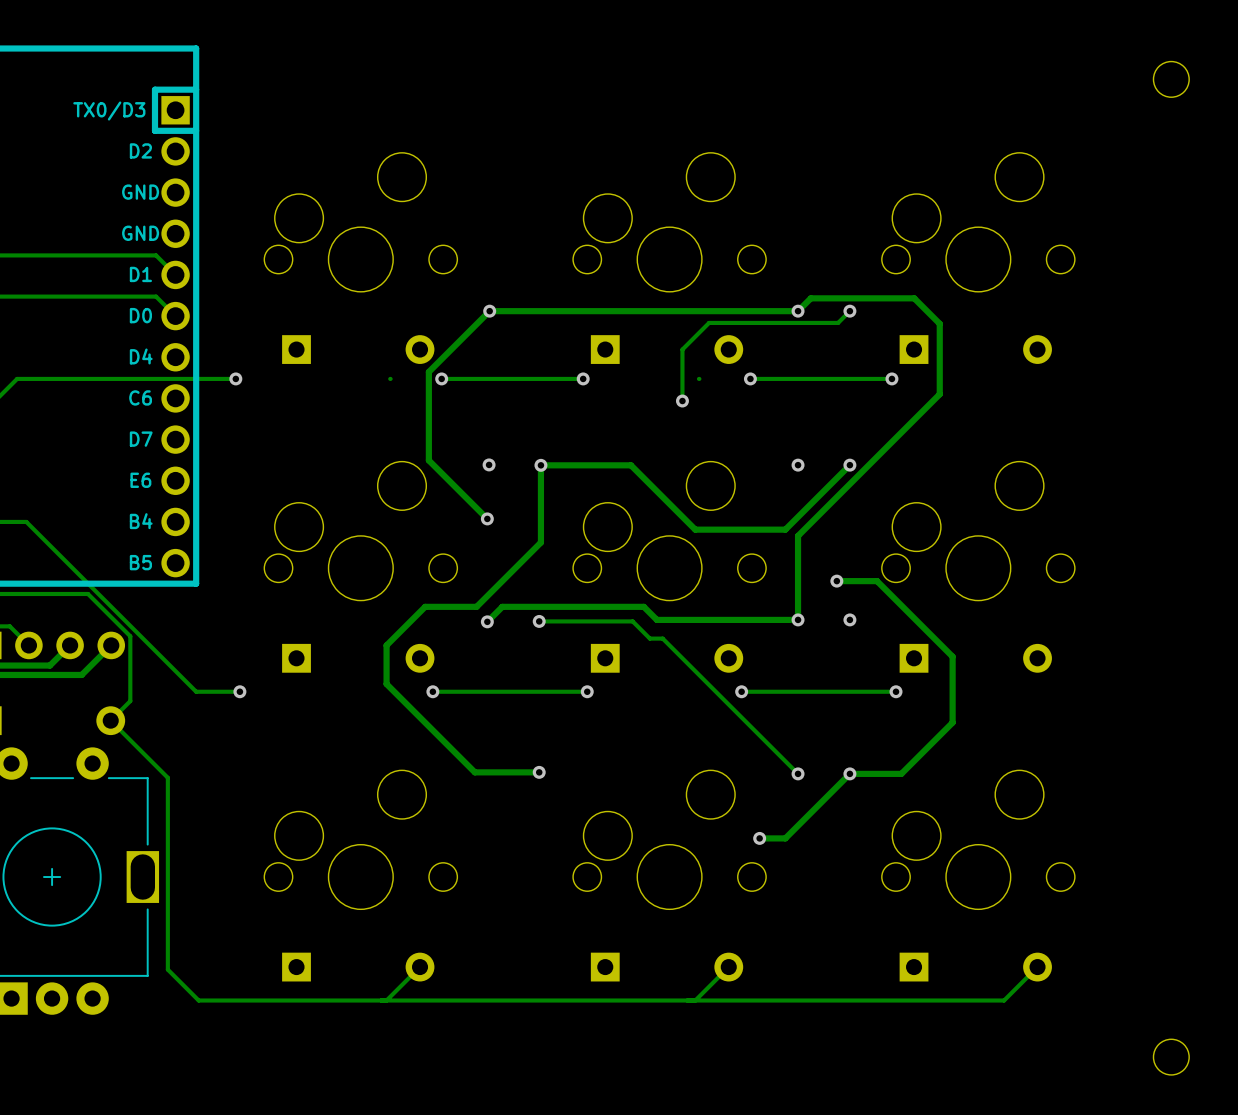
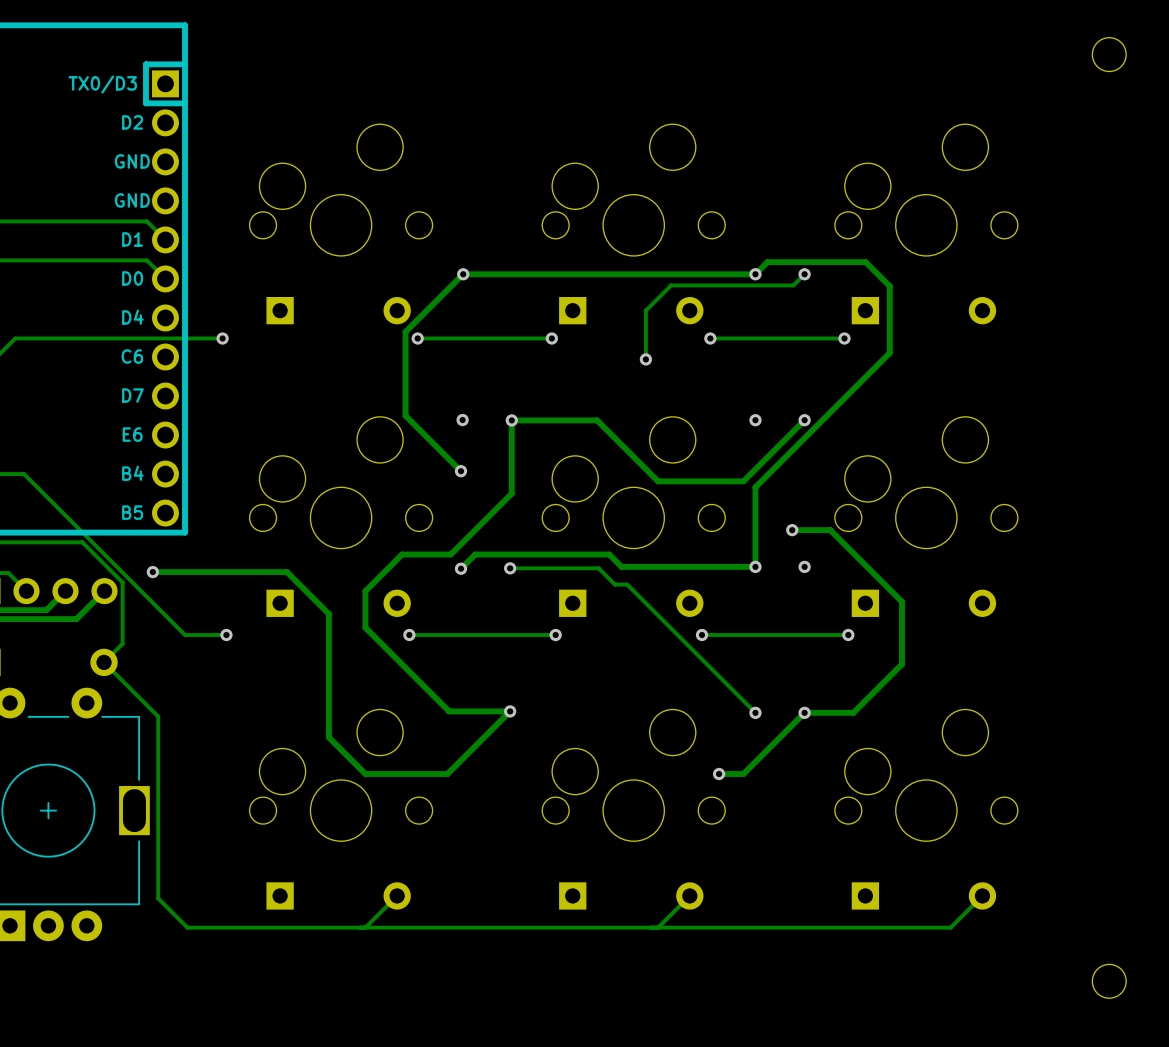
track: (390, 378) (390, 378) -> none
track: (699, 378) (698, 378) -> none
track: none -> (152, 572) (286, 572) (328, 613) (328, 737) (365, 774) (447, 774) (510, 711)
via: none -> (152, 572)

